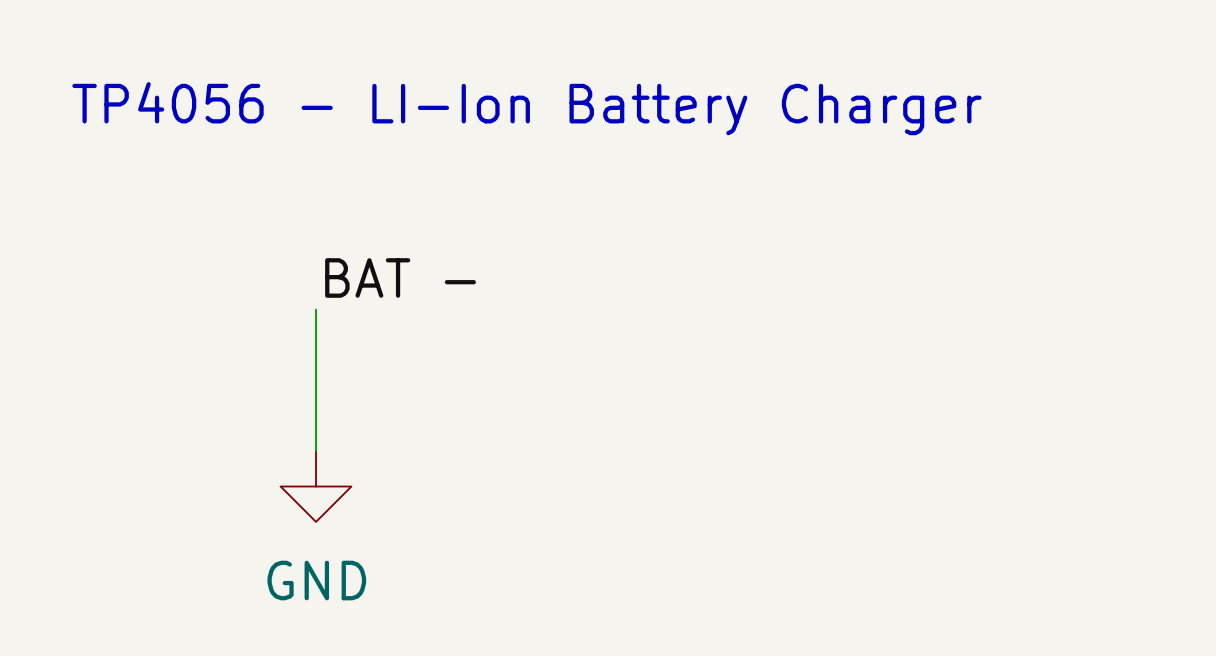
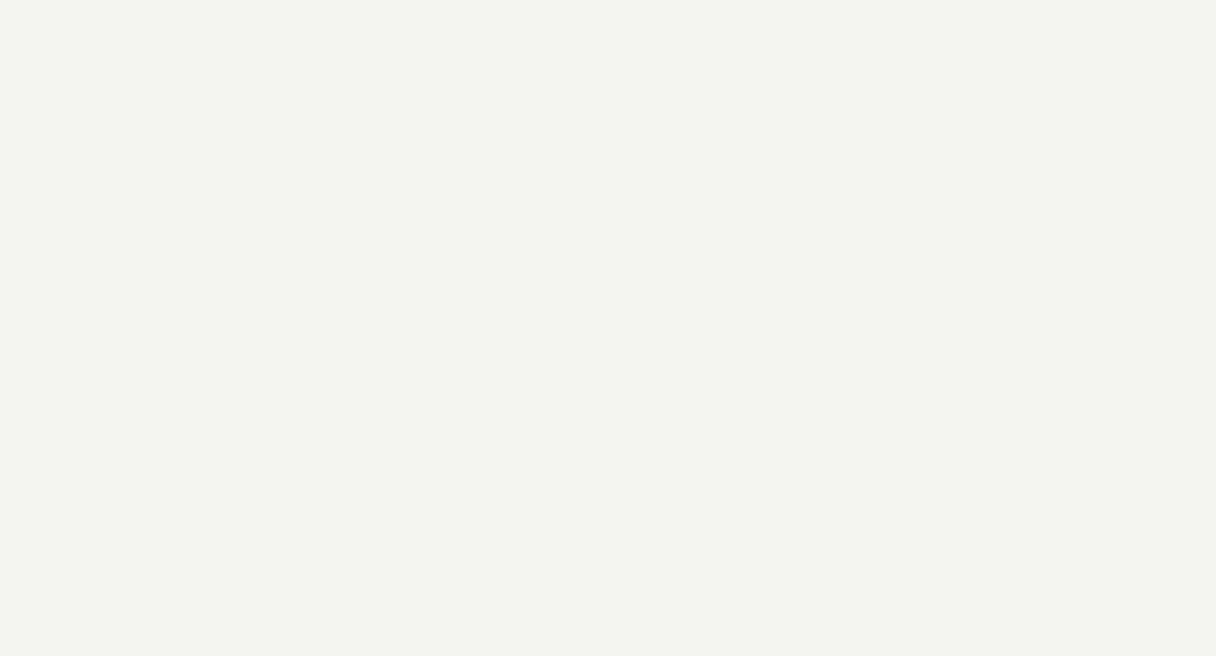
text: TP4056 - LI-Ion Battery Charger (526, 108) -> none
label: BAT - (400, 277) -> none
wire: (316, 309) (316, 451) -> none
power symbol: GND (316, 486) -> none

